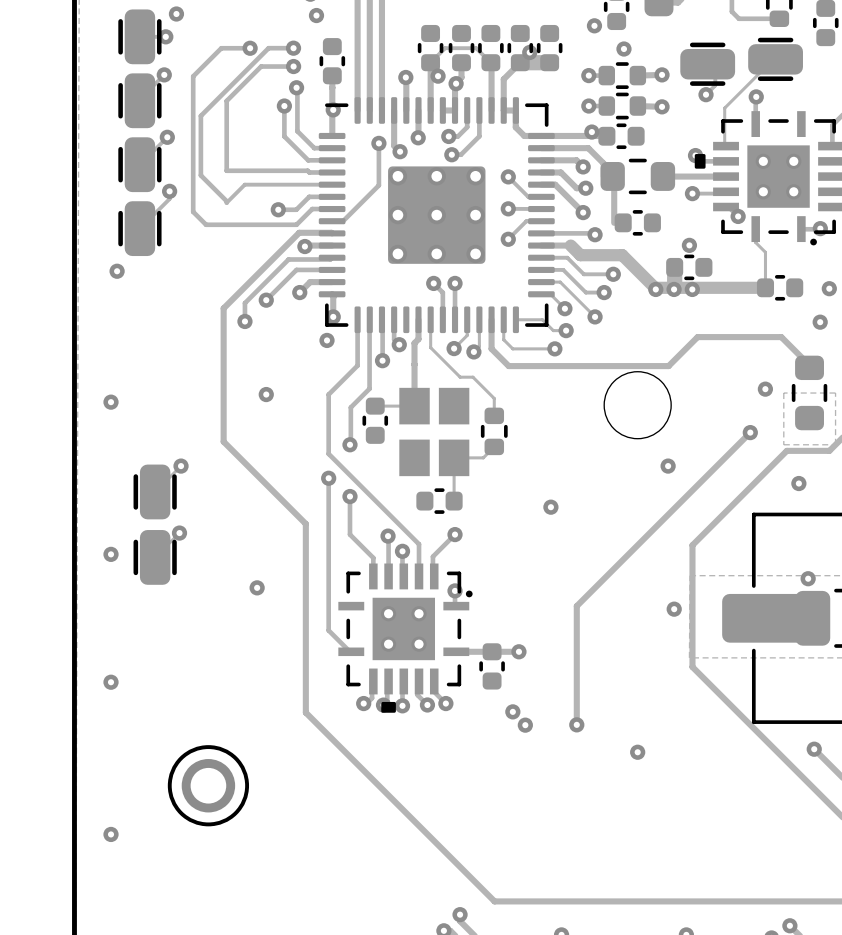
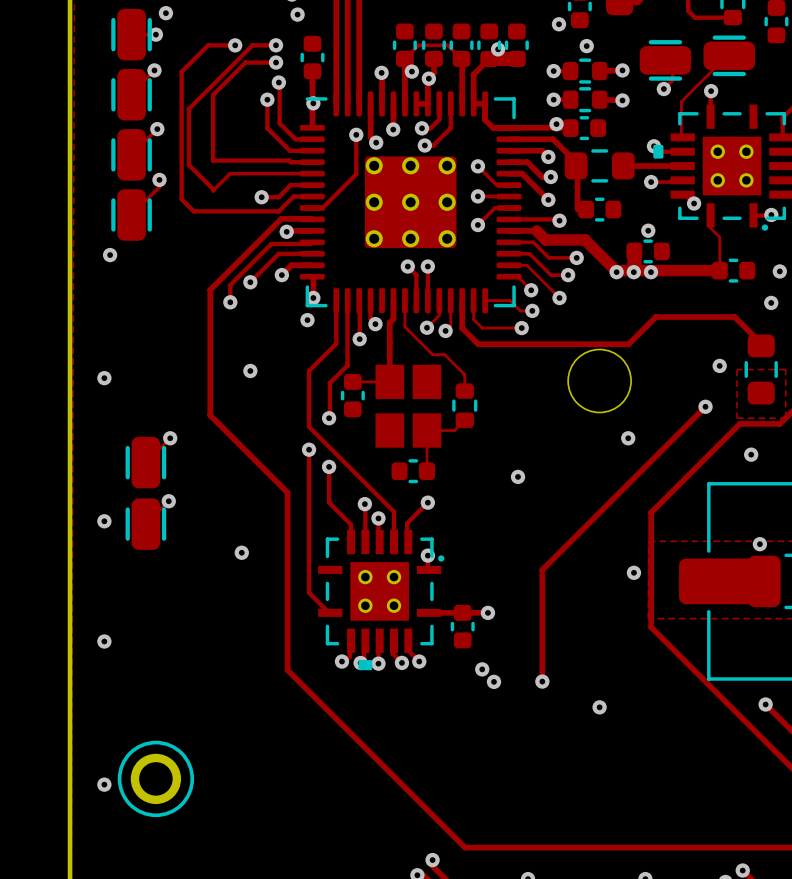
part position: (208, 785) -> (155, 778)

